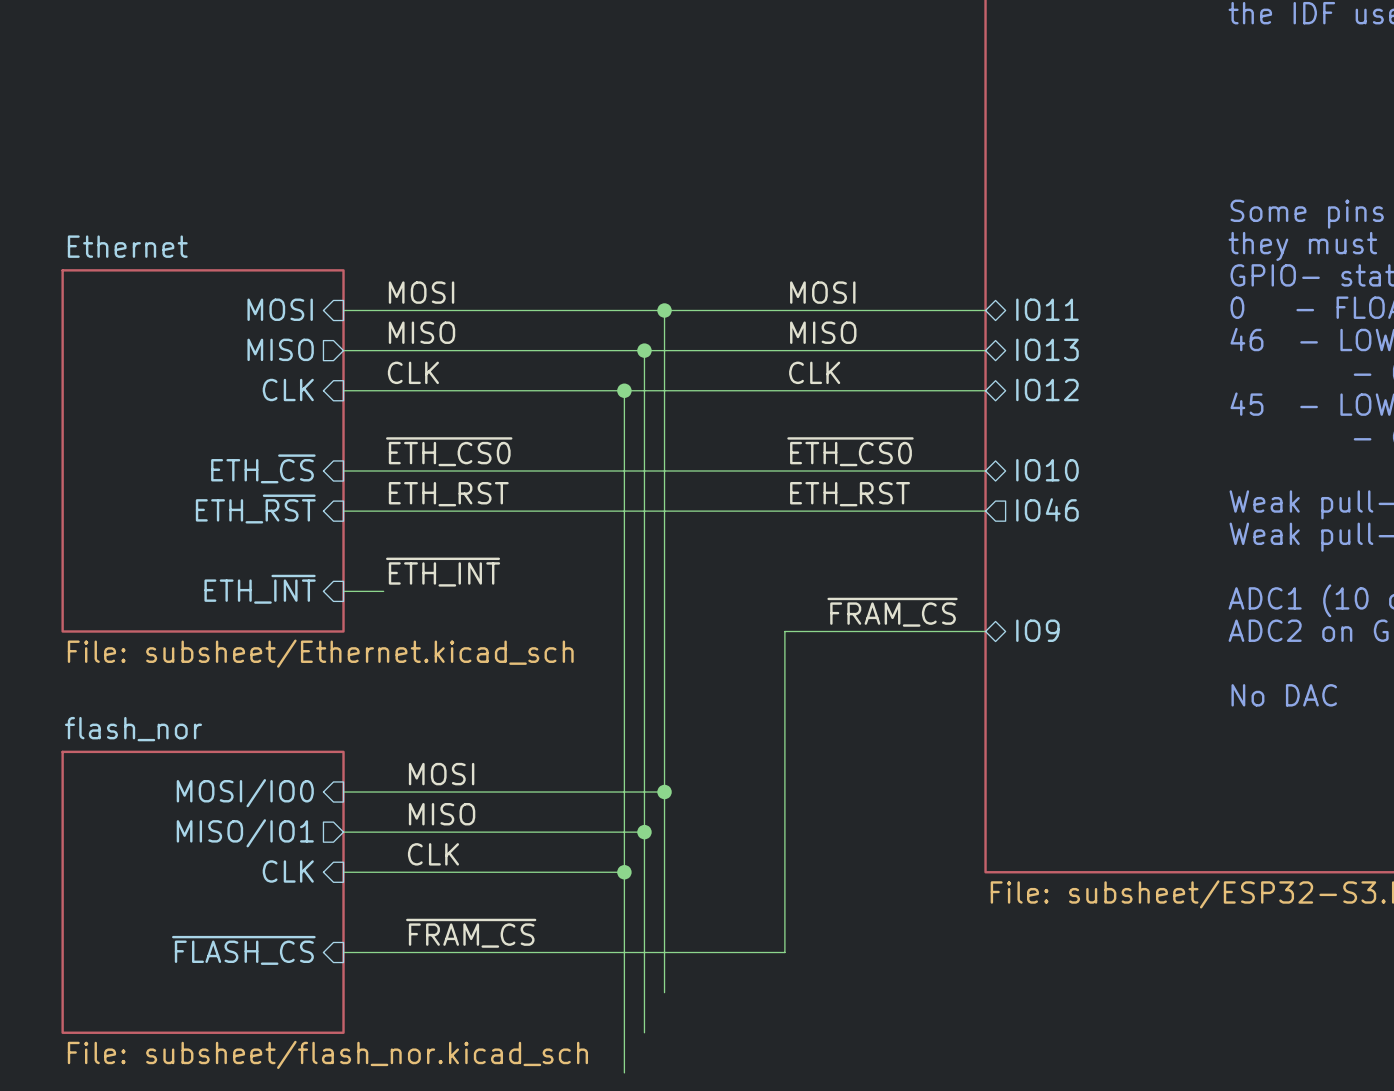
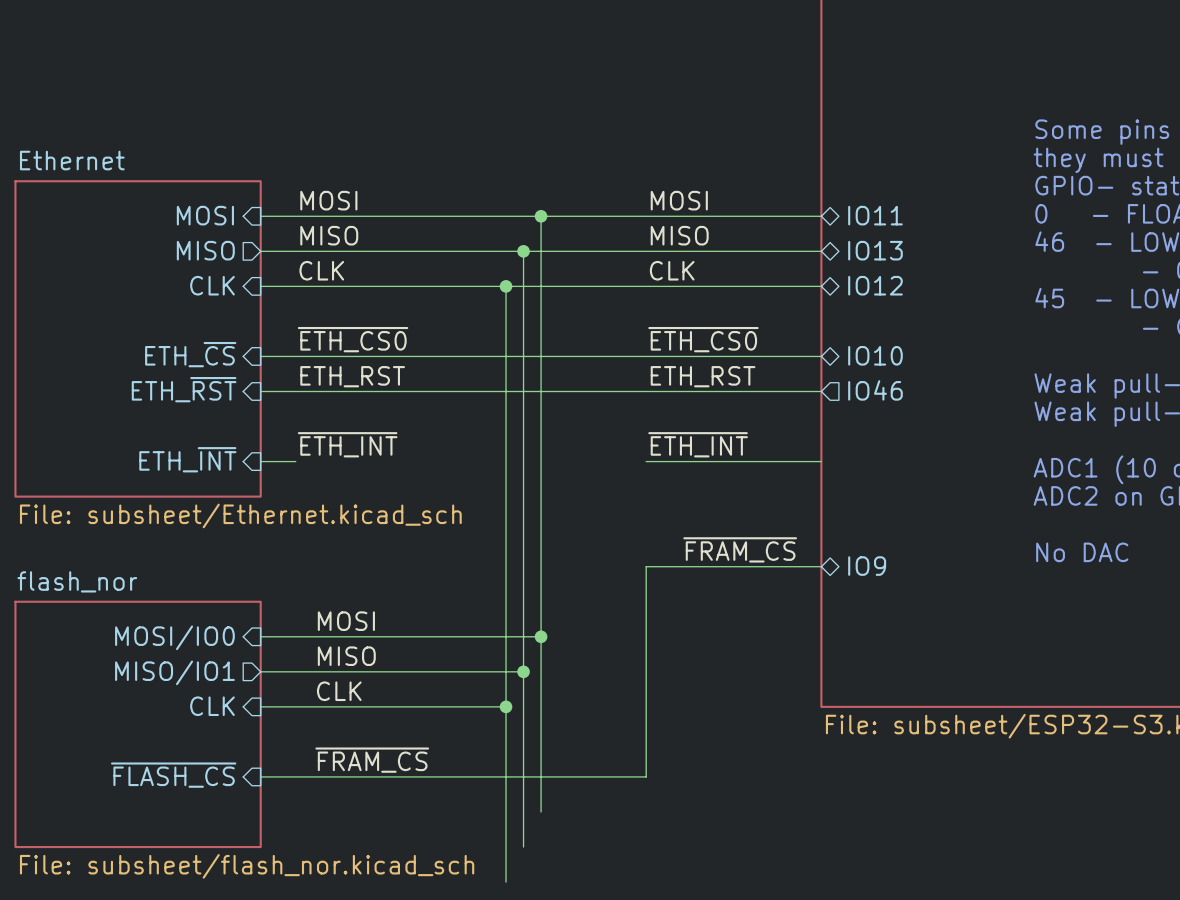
label: none -> ~{ETH_INT} (698, 444)
wire: none -> (646, 461) (821, 461)
label position: ~{FRAM_CS} (892, 612) -> ~{FRAM_CS} (740, 549)
sheet pin position: IO9 (1037, 630) -> IO9 (867, 566)
wire: (985, 631) (784, 631) (784, 711) -> (821, 566) (646, 566)

